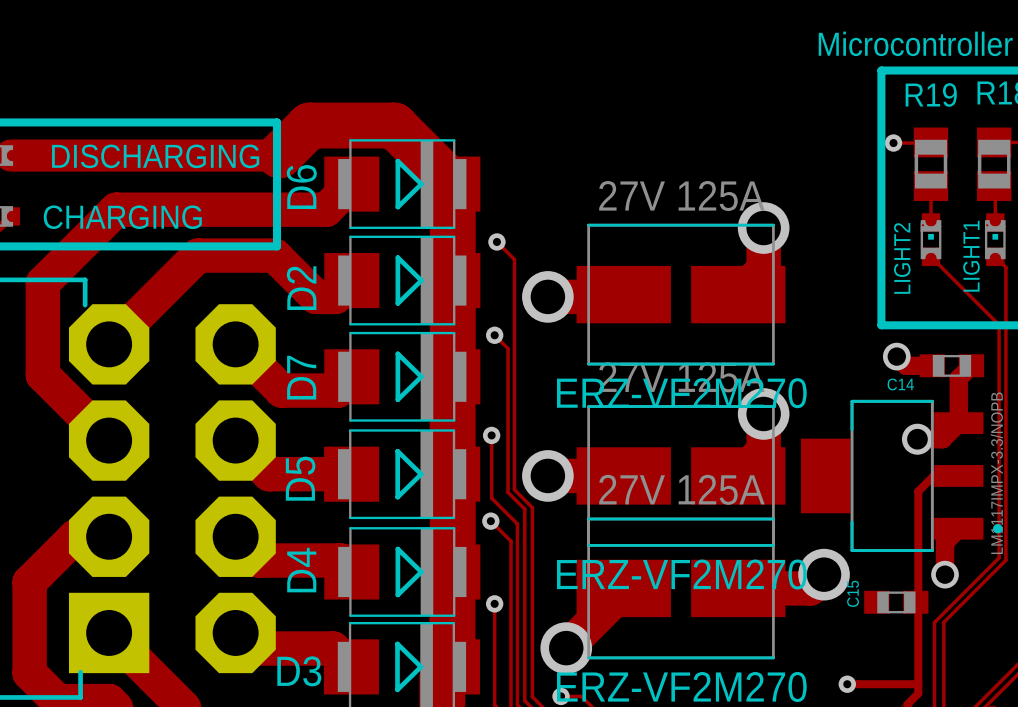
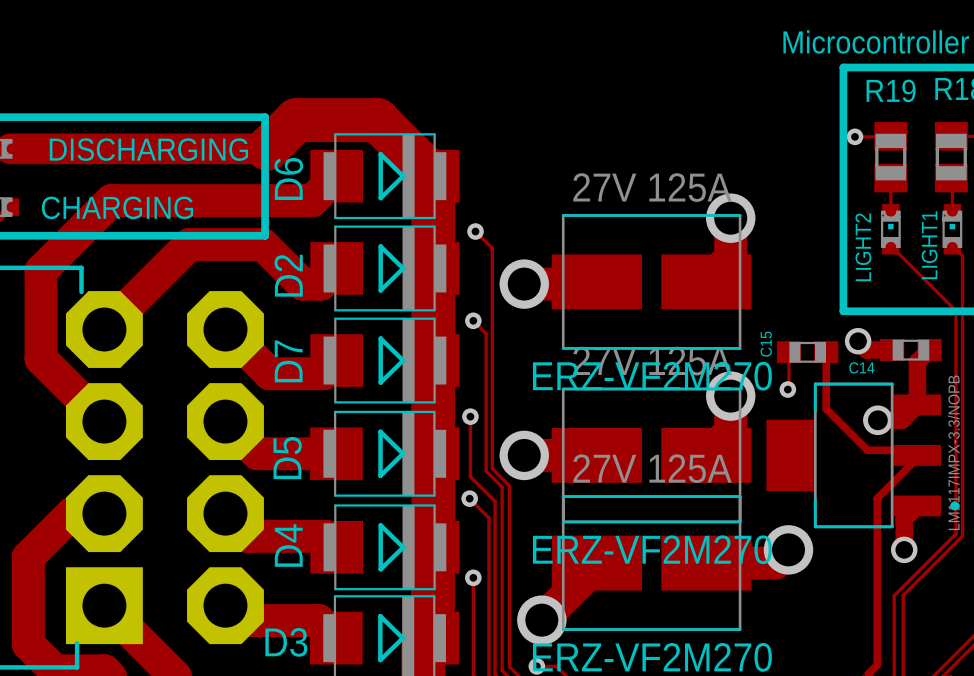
track: none -> (788, 352) (787, 389)
via: none -> (787, 389)
track: (958, 475) (933, 475) (918, 491) (918, 693) (916, 695) -> (826, 352) (826, 408) (867, 450) (917, 450) (917, 458) (877, 498) (877, 665)
C15 position: (896, 602) -> (807, 352)
track: (847, 684) (918, 684) -> none
via: (847, 684) -> none

